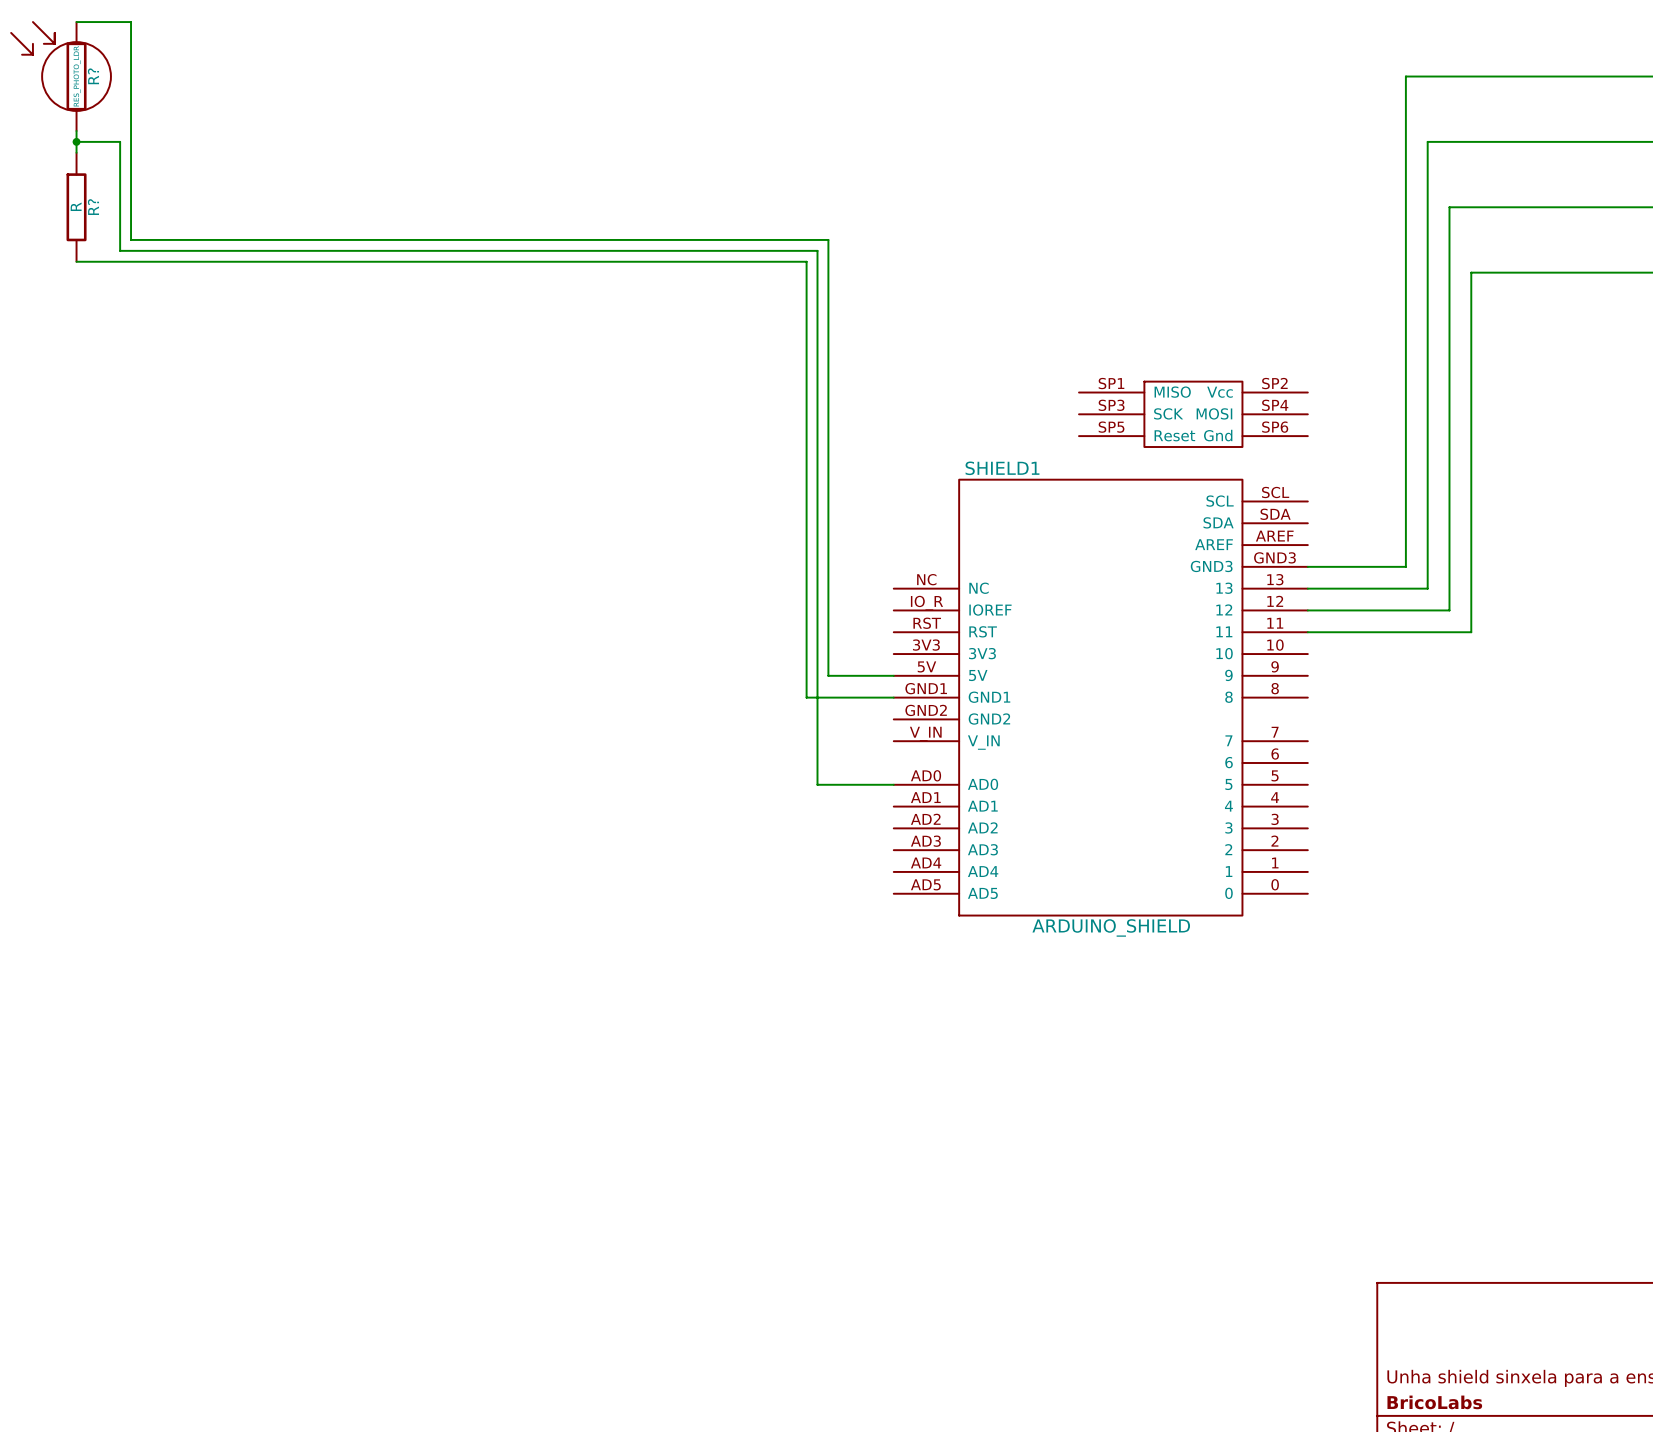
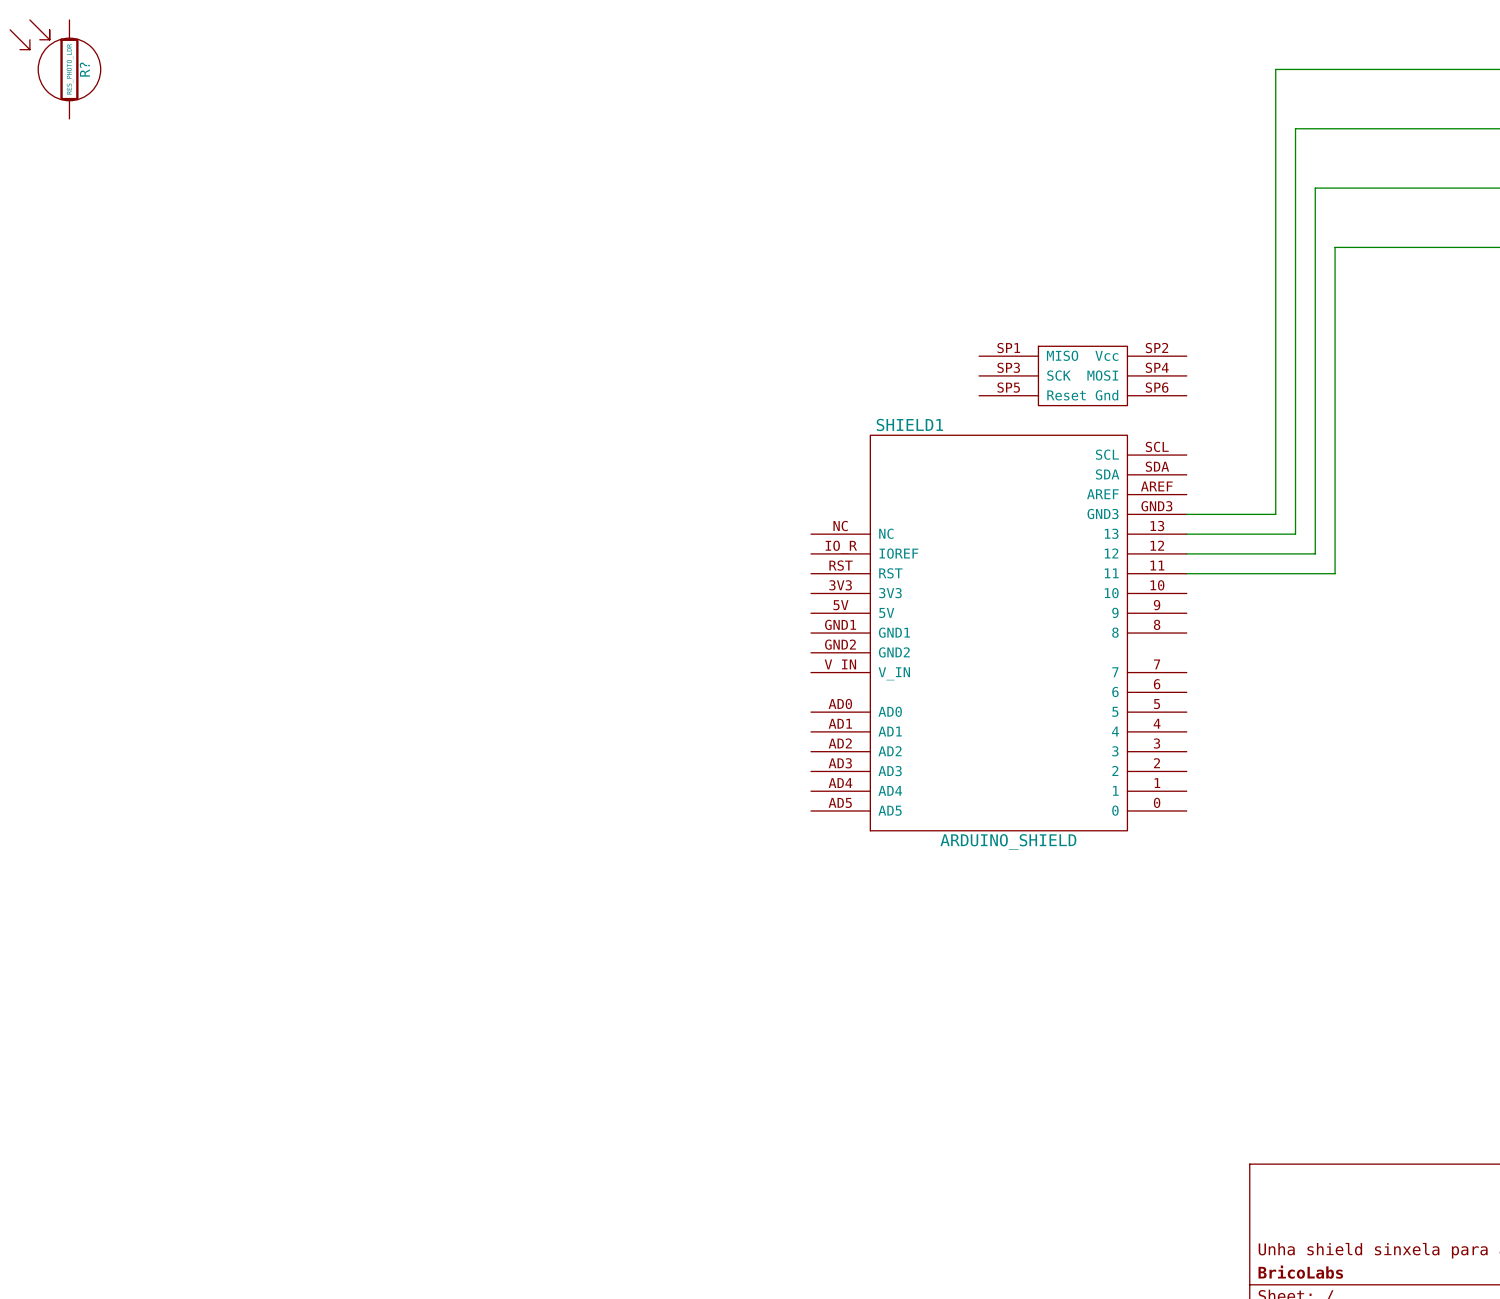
wire: (76, 22) (131, 22) (131, 239) (828, 239) (828, 675) (893, 675) -> none
wire: (76, 131) (76, 152) -> none
wire: (76, 141) (120, 141) (120, 250) (817, 250) (817, 784) (893, 784) -> none
junction: (76, 141) -> none
R?: R (76, 207) -> none
wire: (76, 261) (806, 261) (806, 697) (893, 697) -> none

